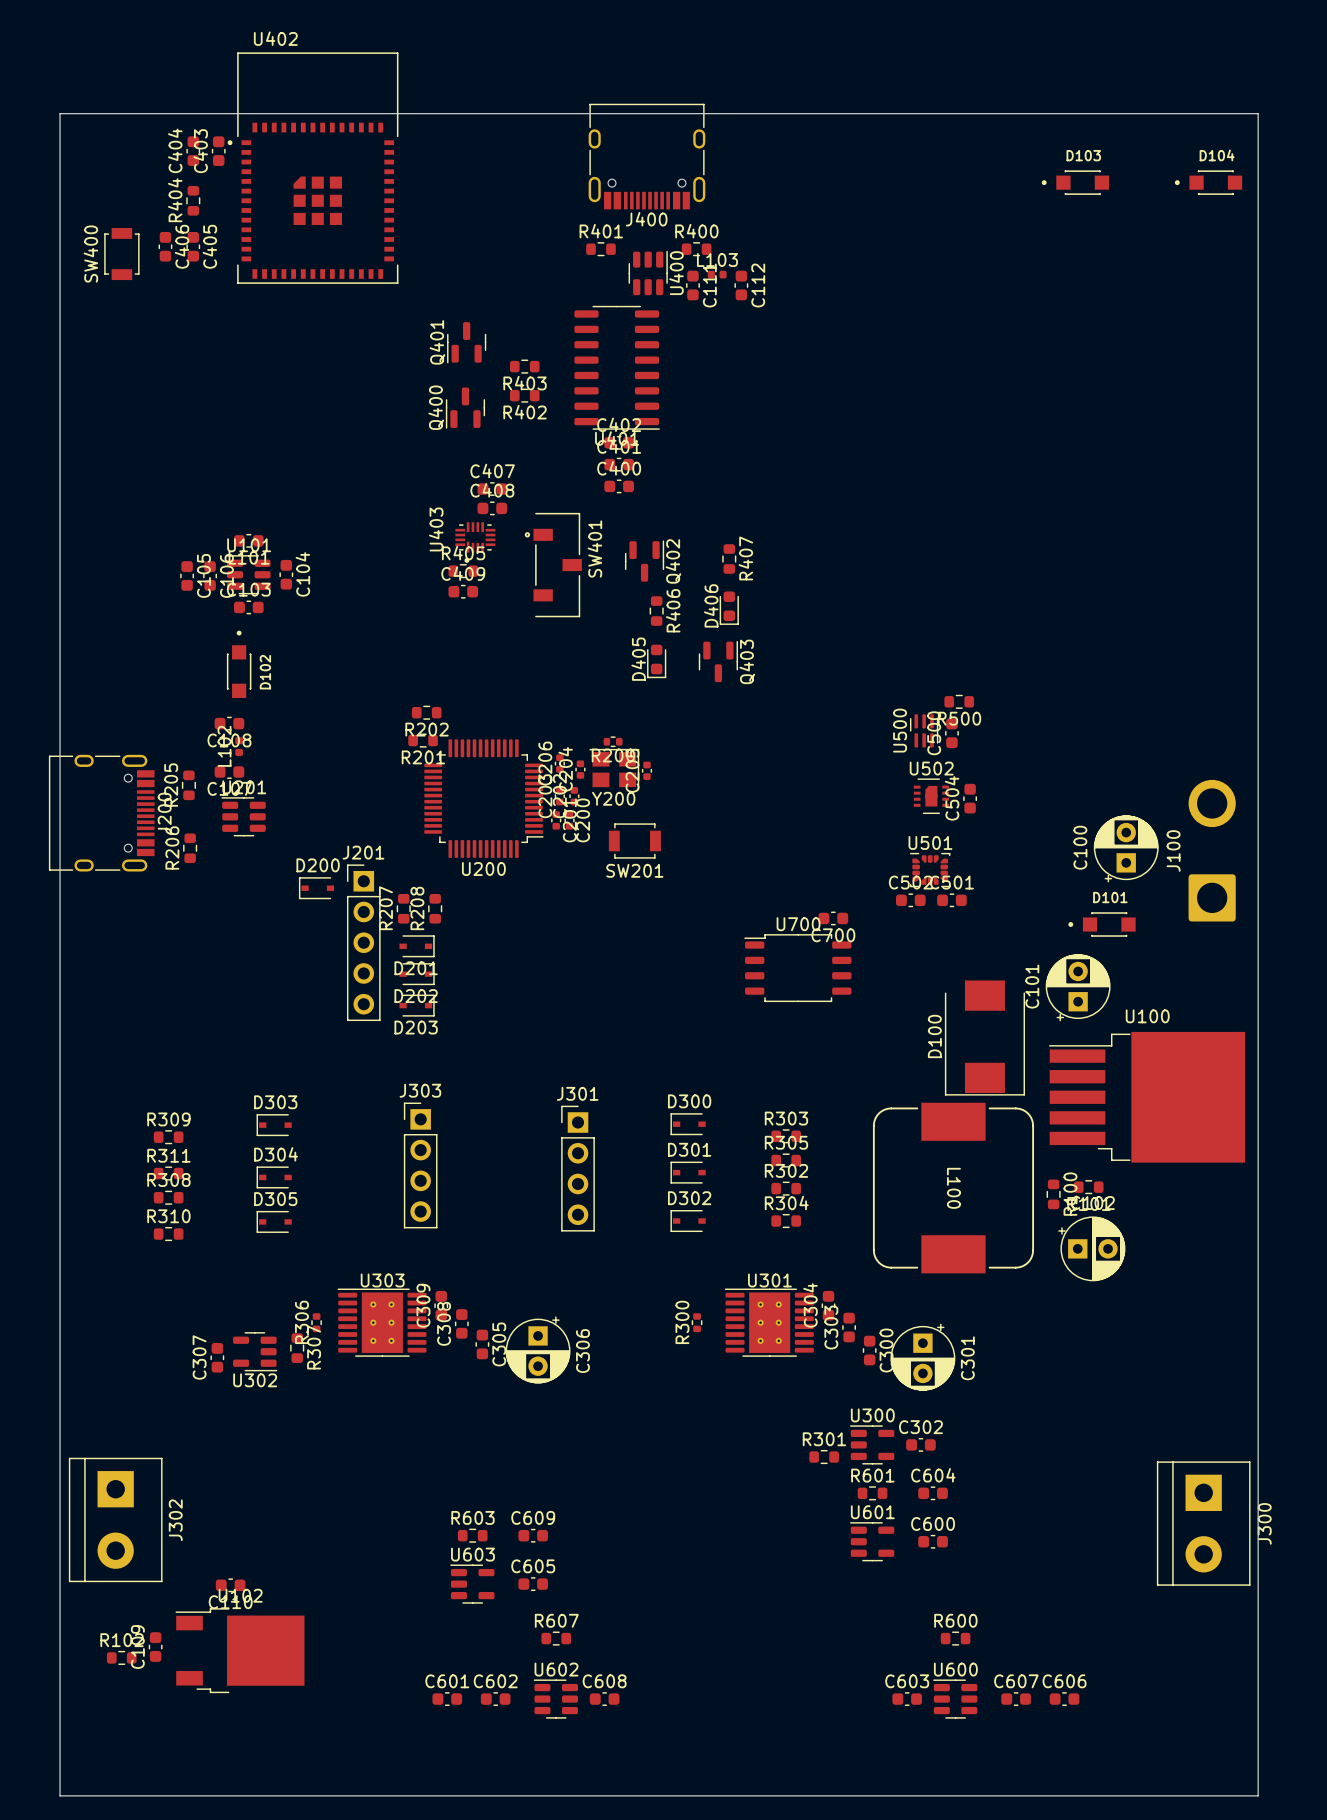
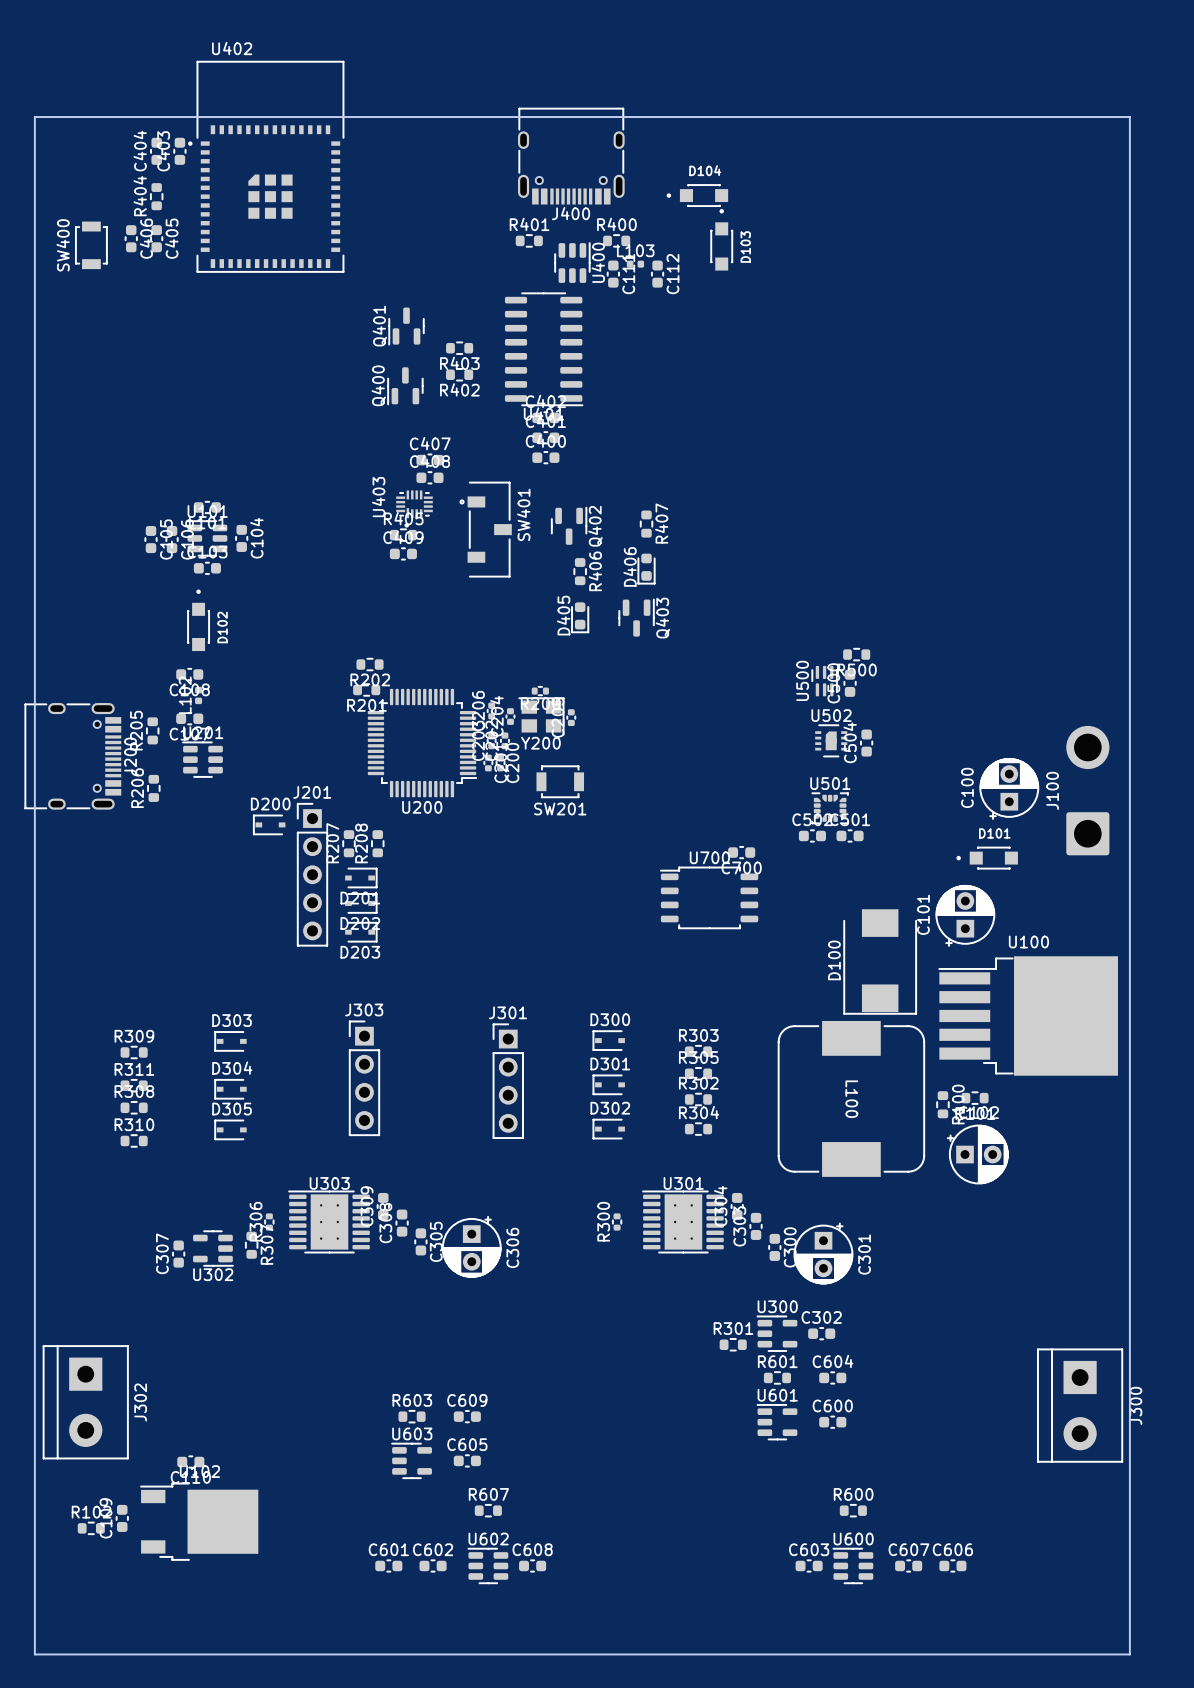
D103 rotation: 0° (1075, 182) -> 90° clockwise (721, 239)
D103 position: (1075, 182) -> (721, 239)
D104 position: (1208, 182) -> (697, 195)

